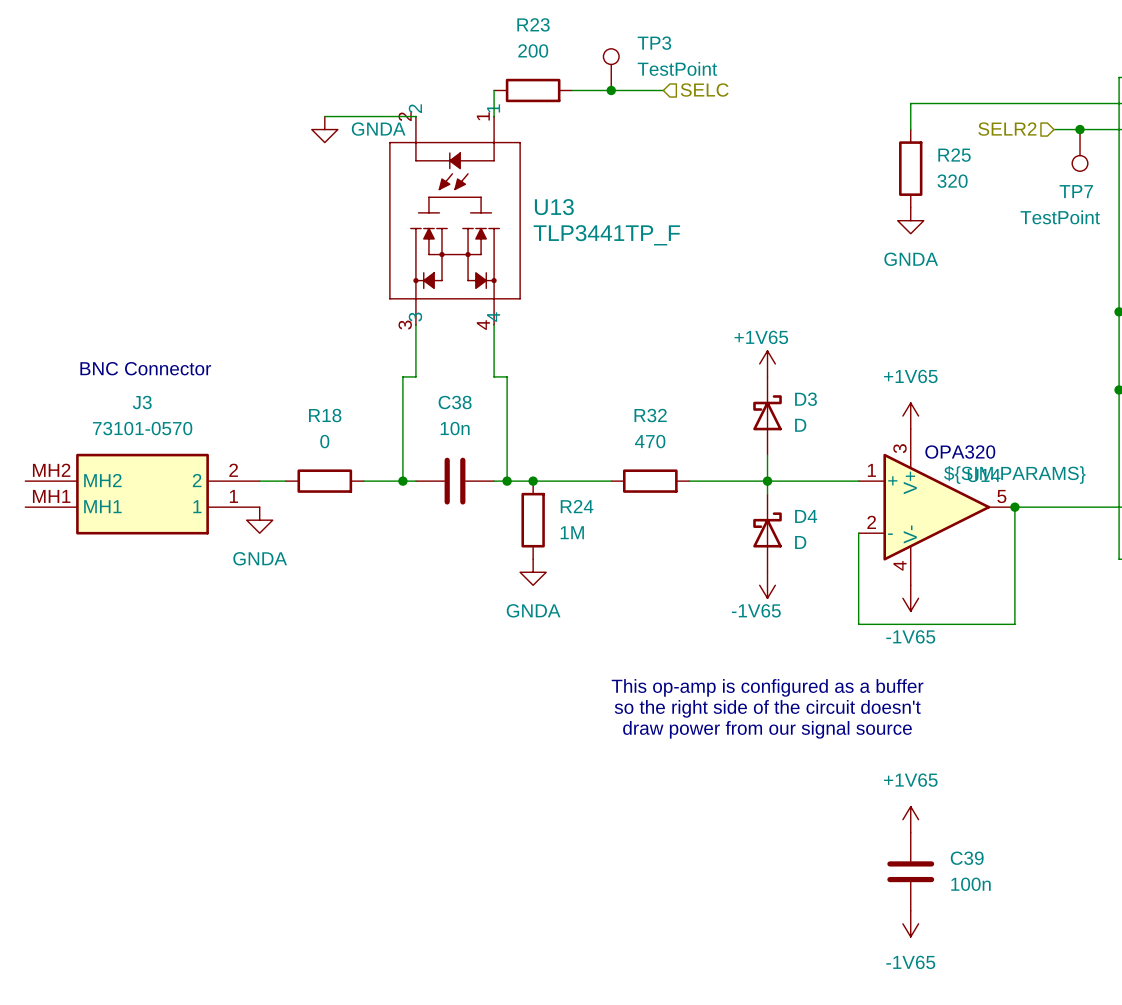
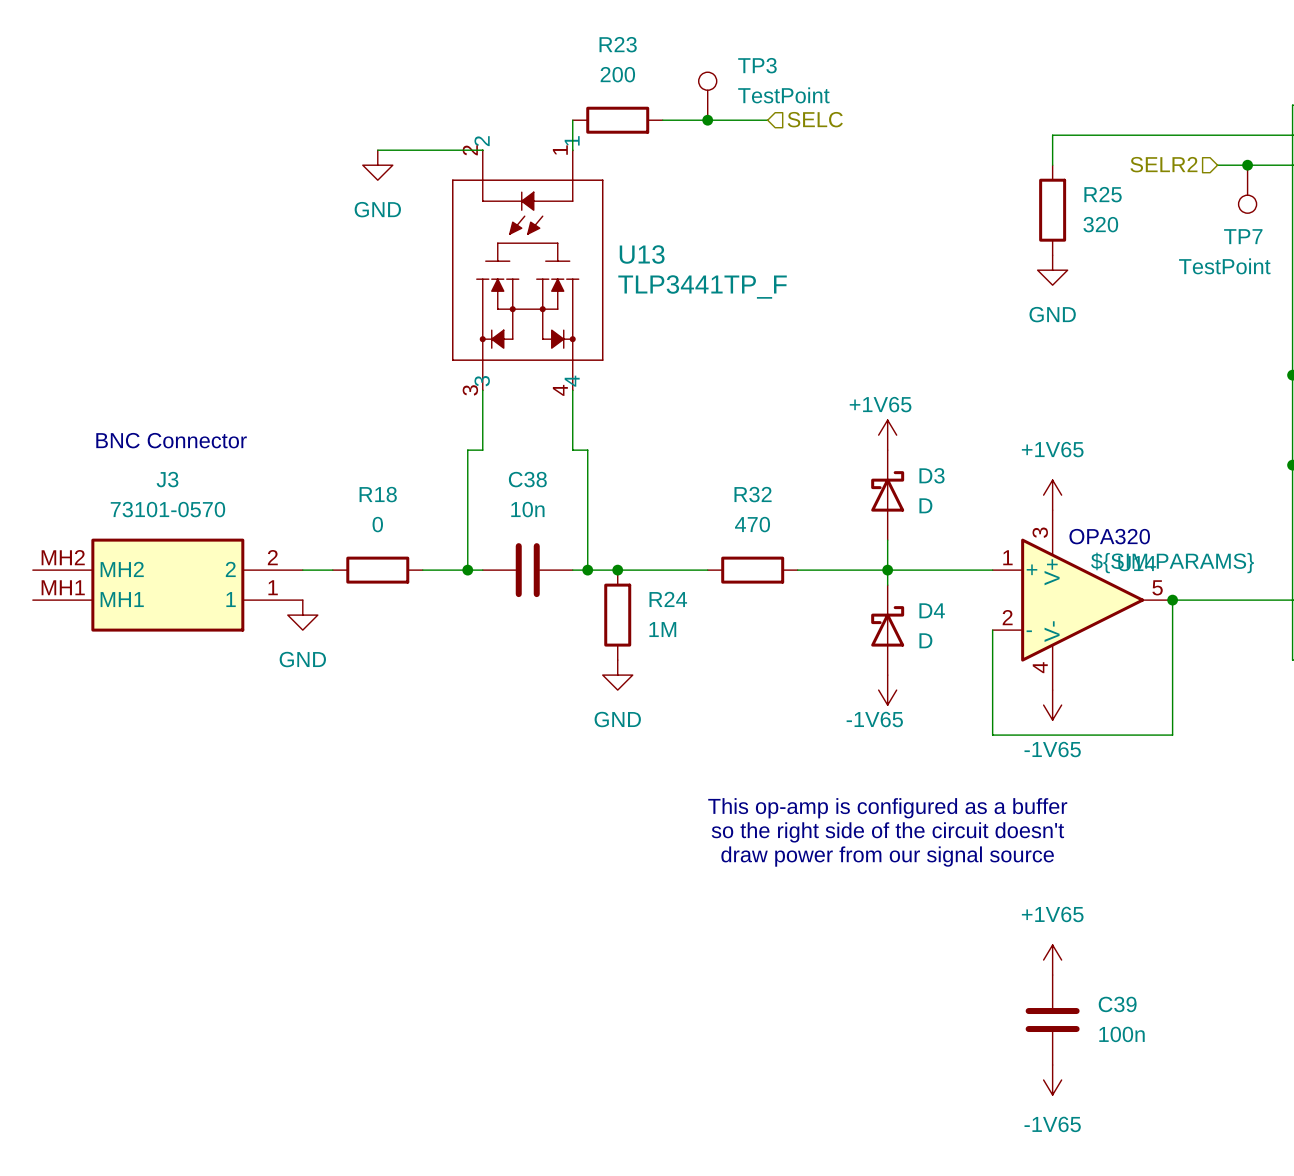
power symbol: GNDA (324, 129) -> GND (377, 165)
power symbol: GNDA (910, 220) -> GND (1052, 270)
power symbol: GNDA (259, 520) -> GND (302, 615)
power symbol: GNDA (533, 572) -> GND (617, 675)

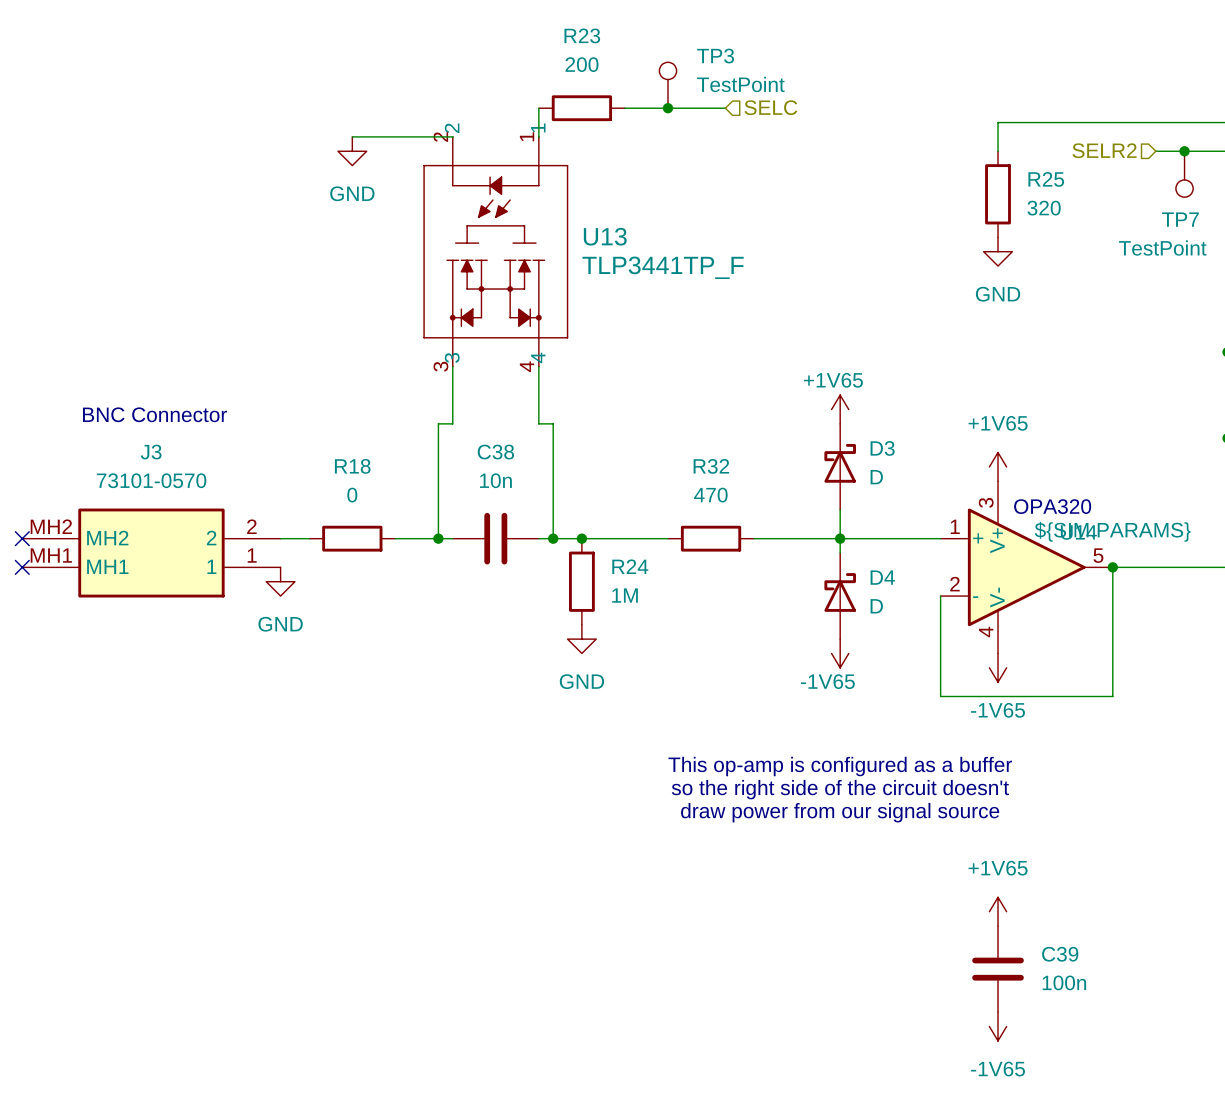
no-connect mark: none -> (22, 538)
no-connect mark: none -> (22, 567)

